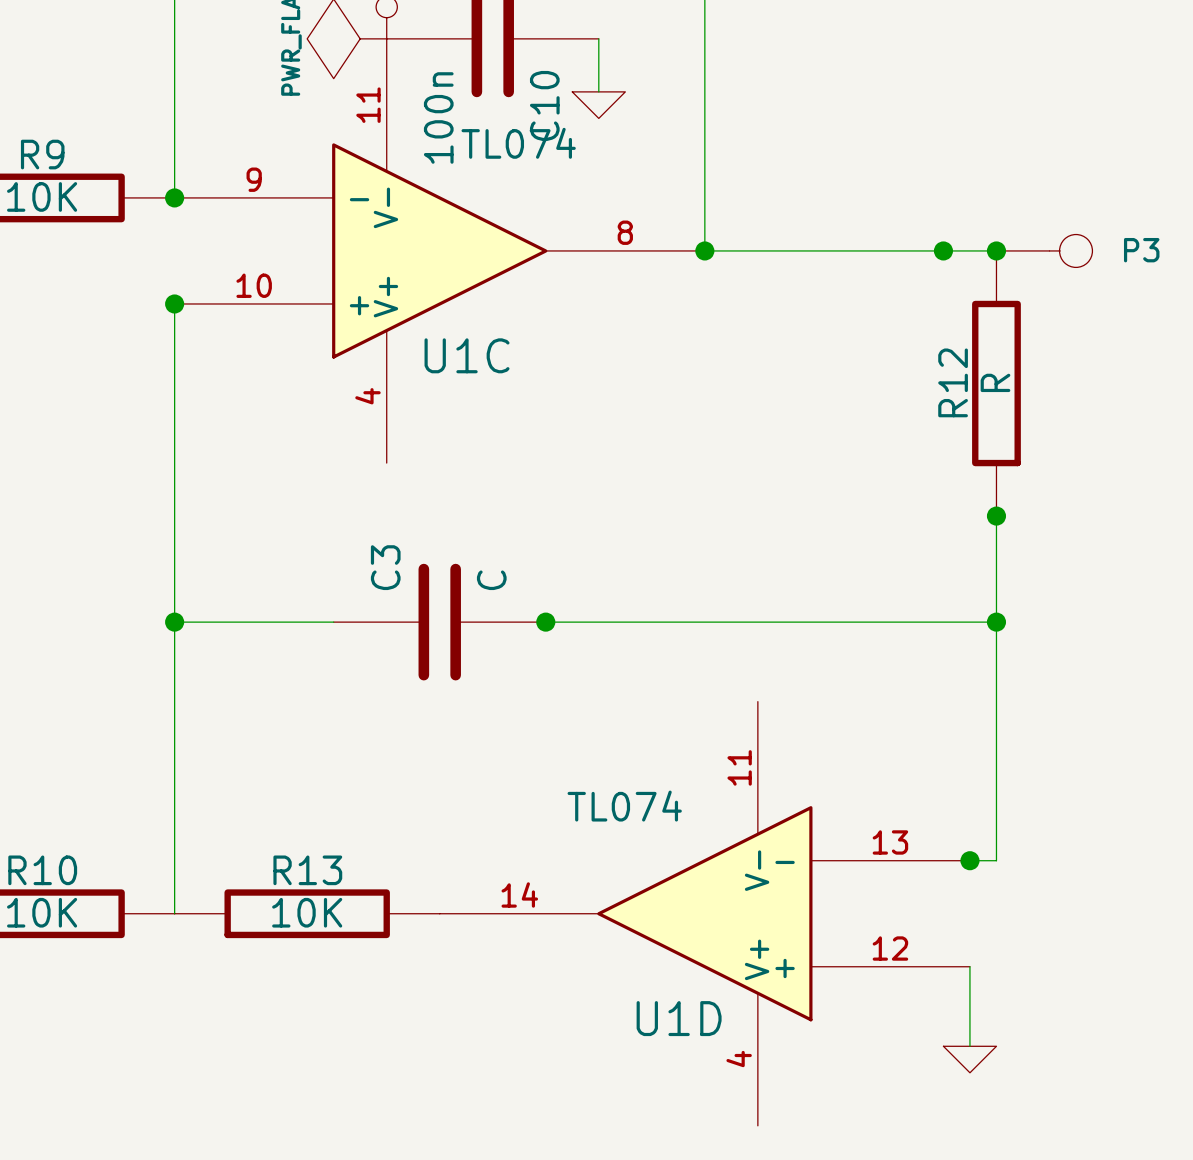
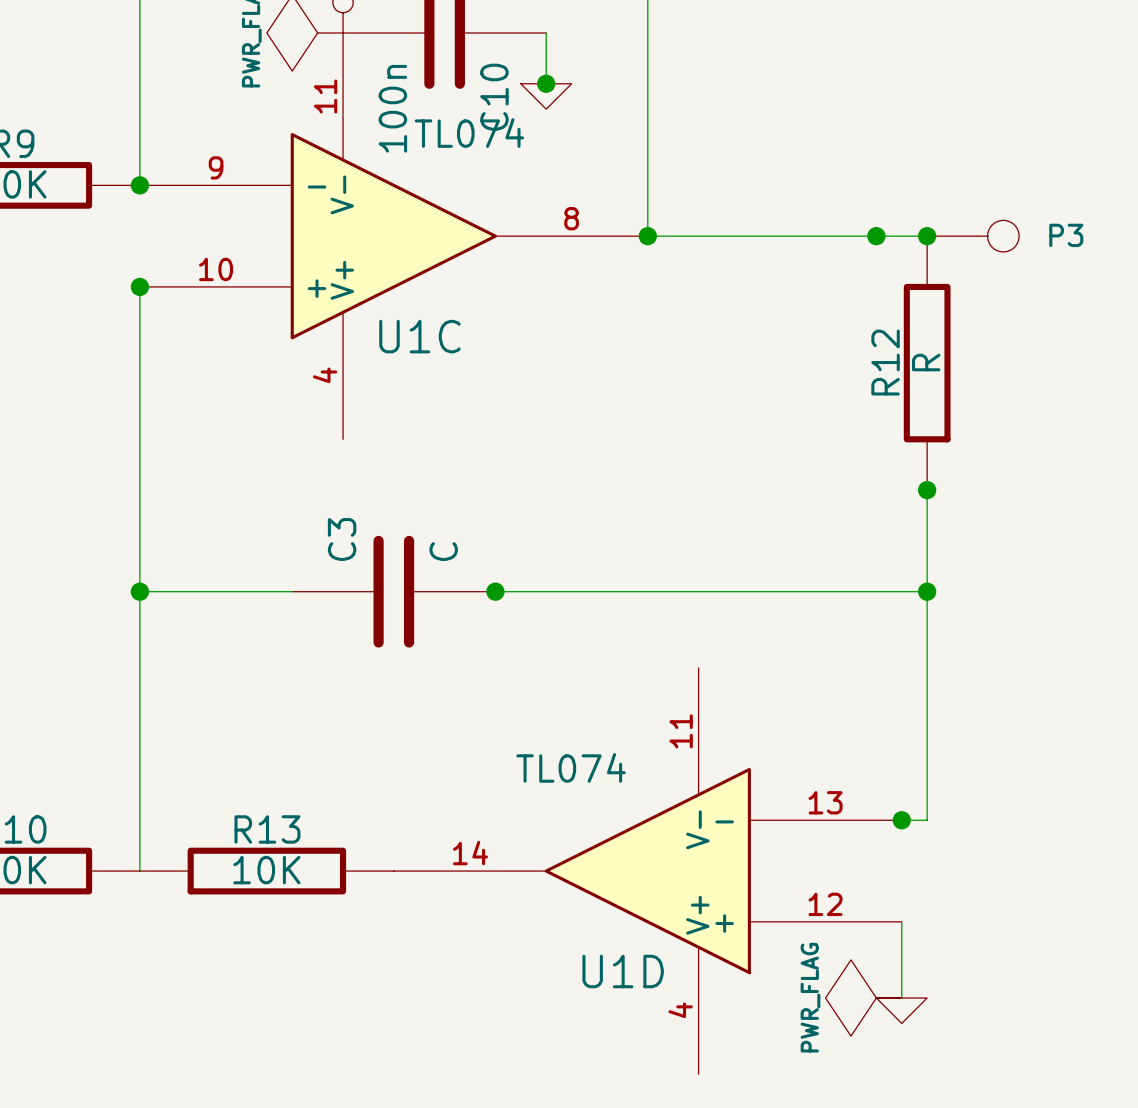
junction: none -> (546, 83)
power symbol: none -> PWR_FLAG (863, 998)

